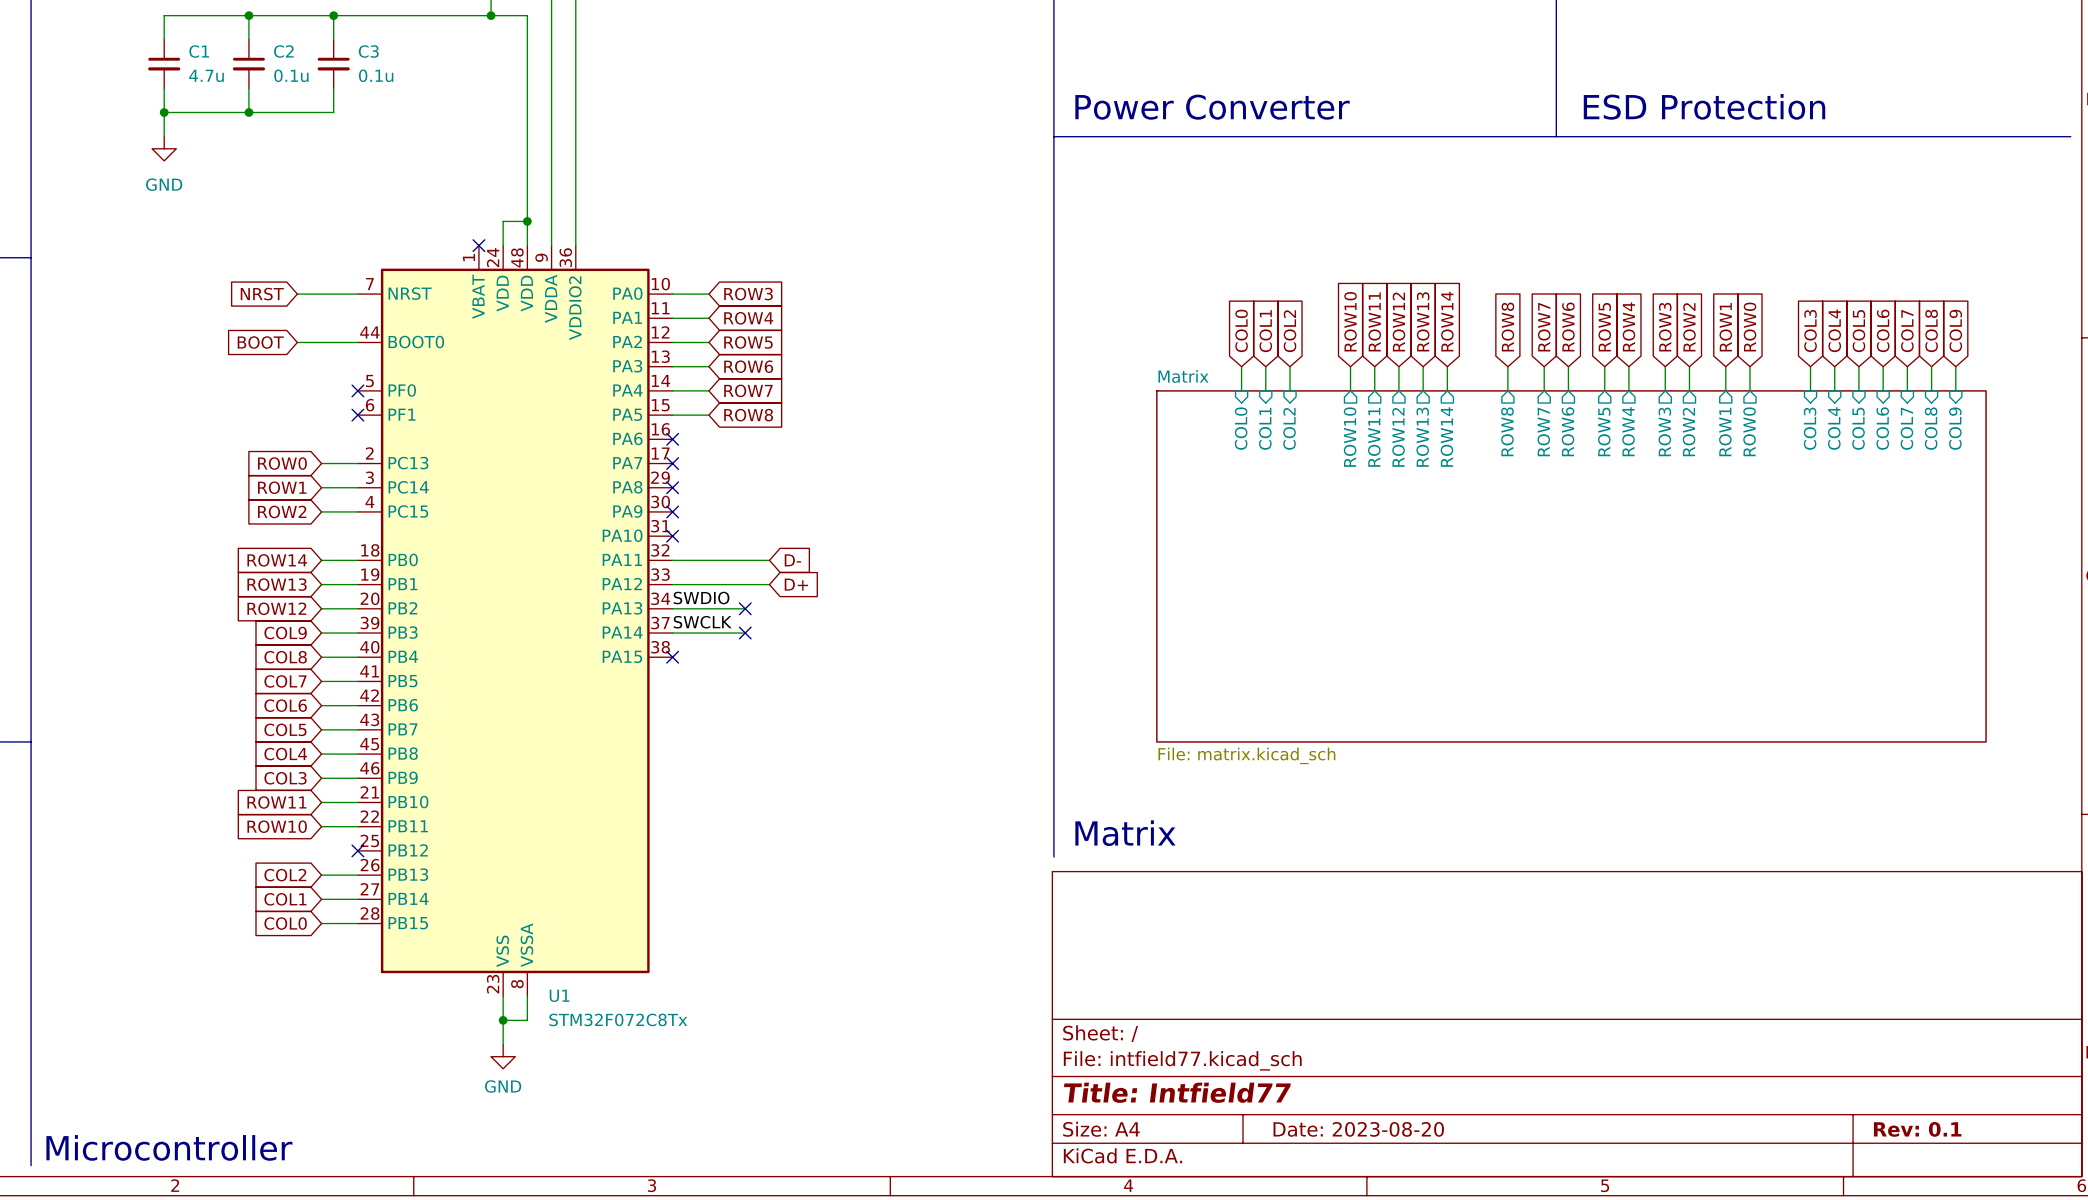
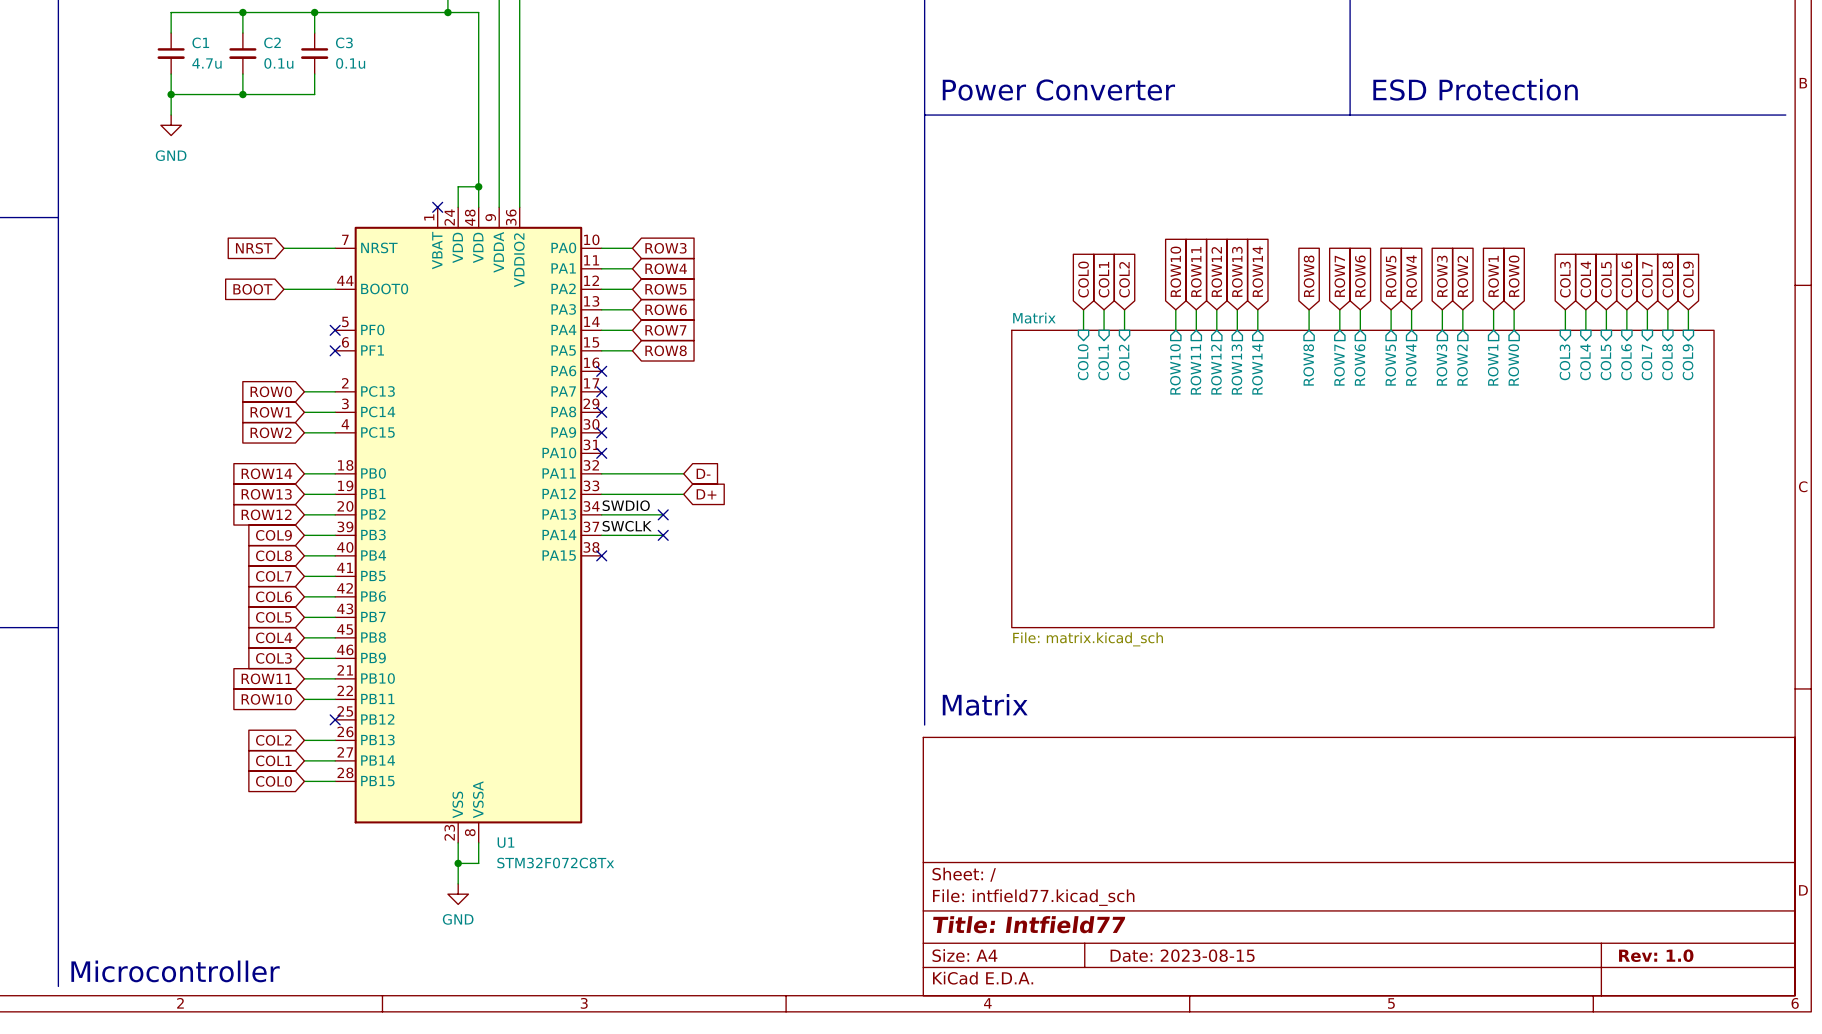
title block: Date: 2023-08-20 (1358, 1129) -> Date: 2023-08-15 (1182, 955)
title block: Rev: 0.1 (1917, 1129) -> Rev: 1.0 (1656, 955)

